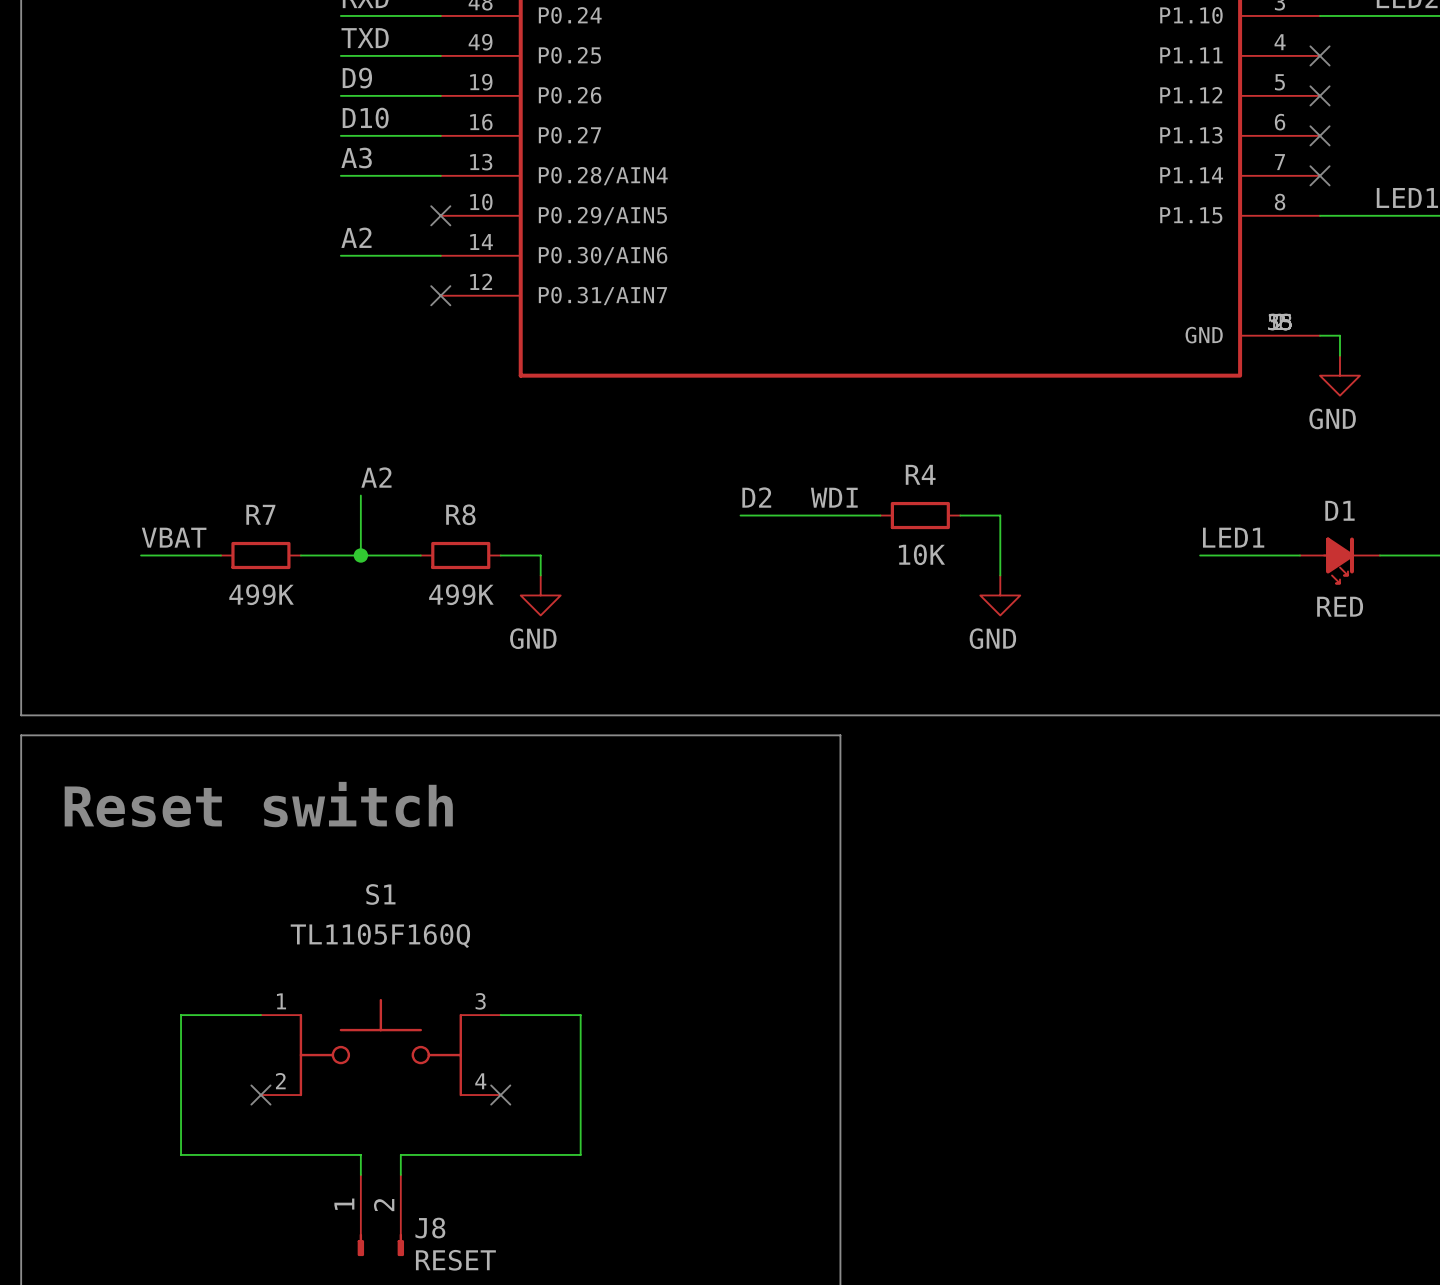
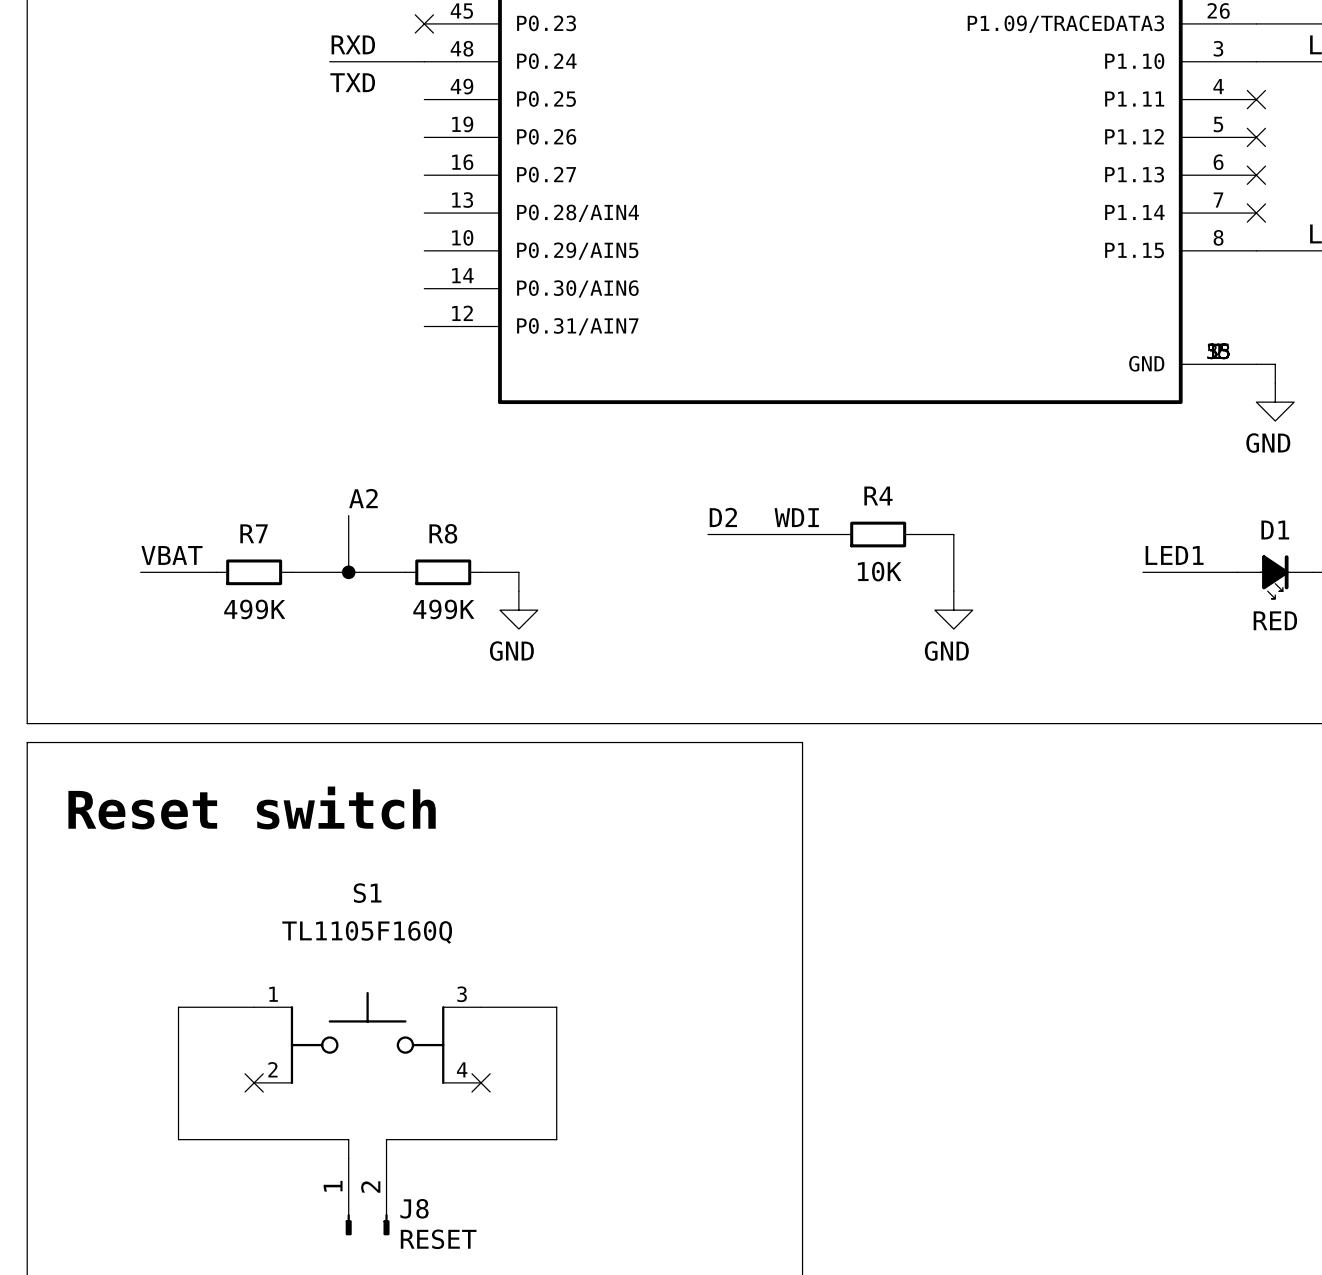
wire: (340, 55) (440, 55) -> none
label: D9 (357, 78) -> none
wire: (340, 95) (440, 95) -> none
label: D10 (365, 118) -> none
wire: (340, 135) (440, 135) -> none
label: A3 (356, 158) -> none
wire: (340, 175) (440, 175) -> none
no-connect mark: (440, 215) -> none
label: A2 (356, 237) -> none
wire: (340, 255) (440, 255) -> none
no-connect mark: (440, 295) -> none

